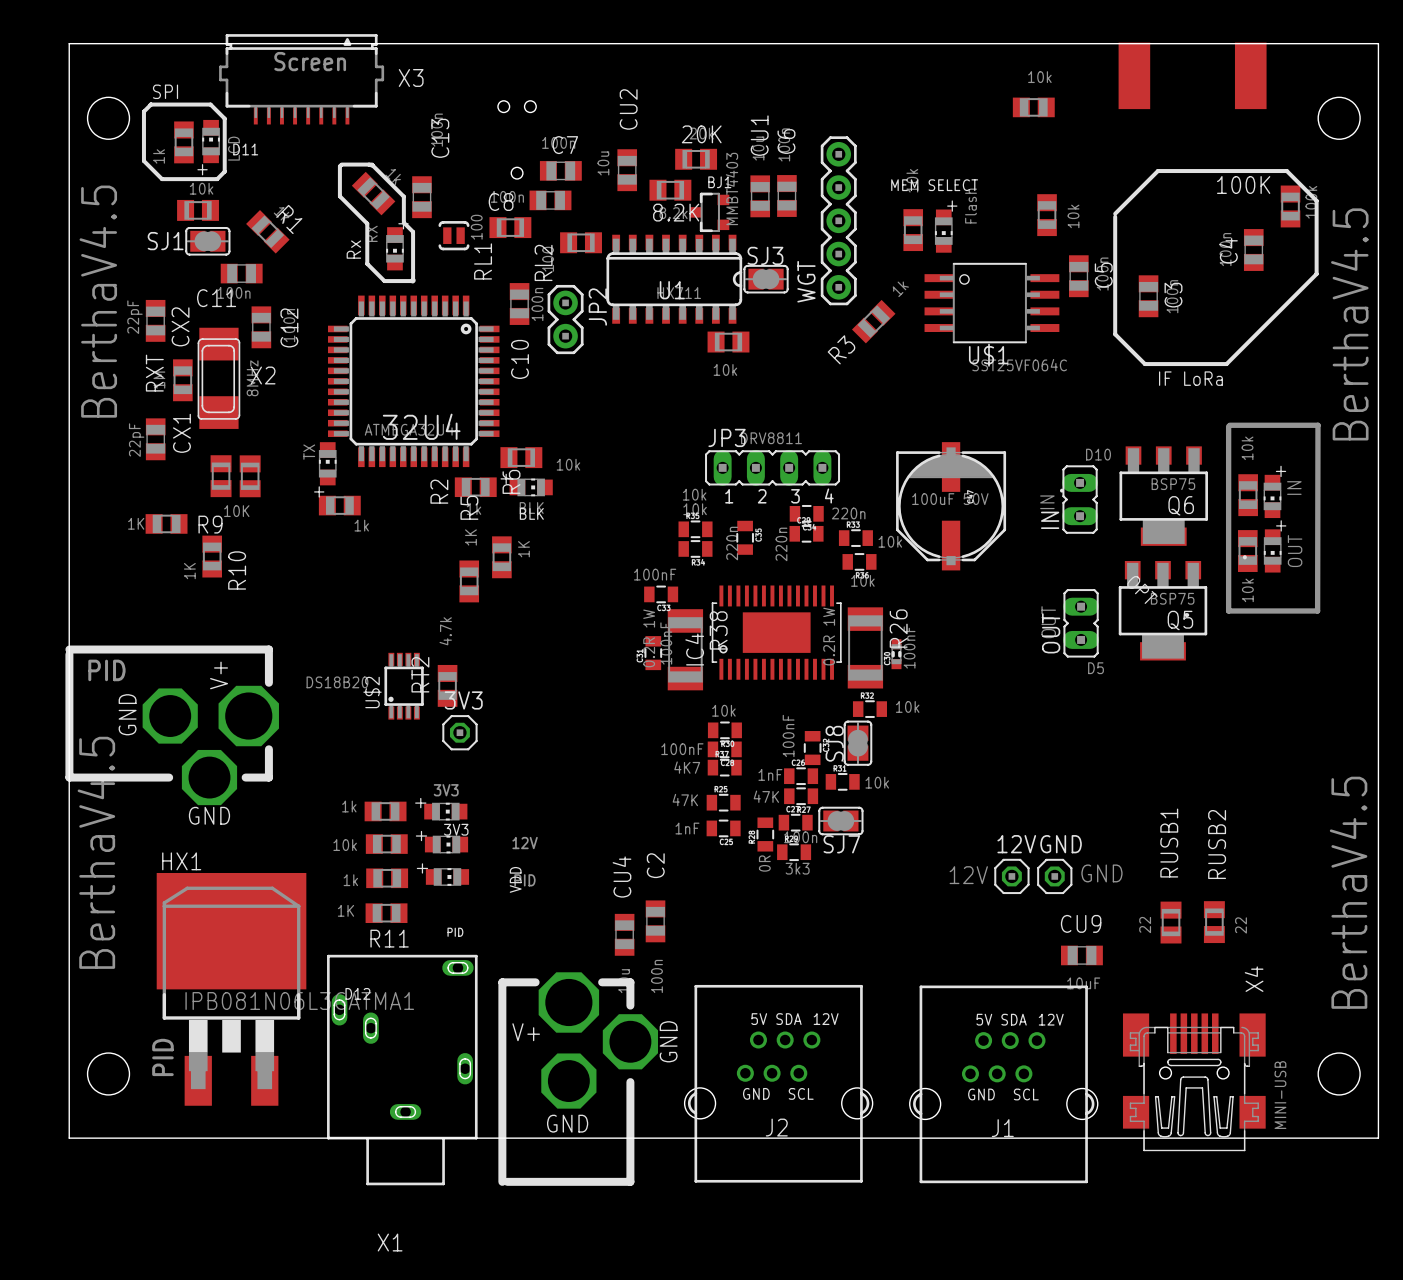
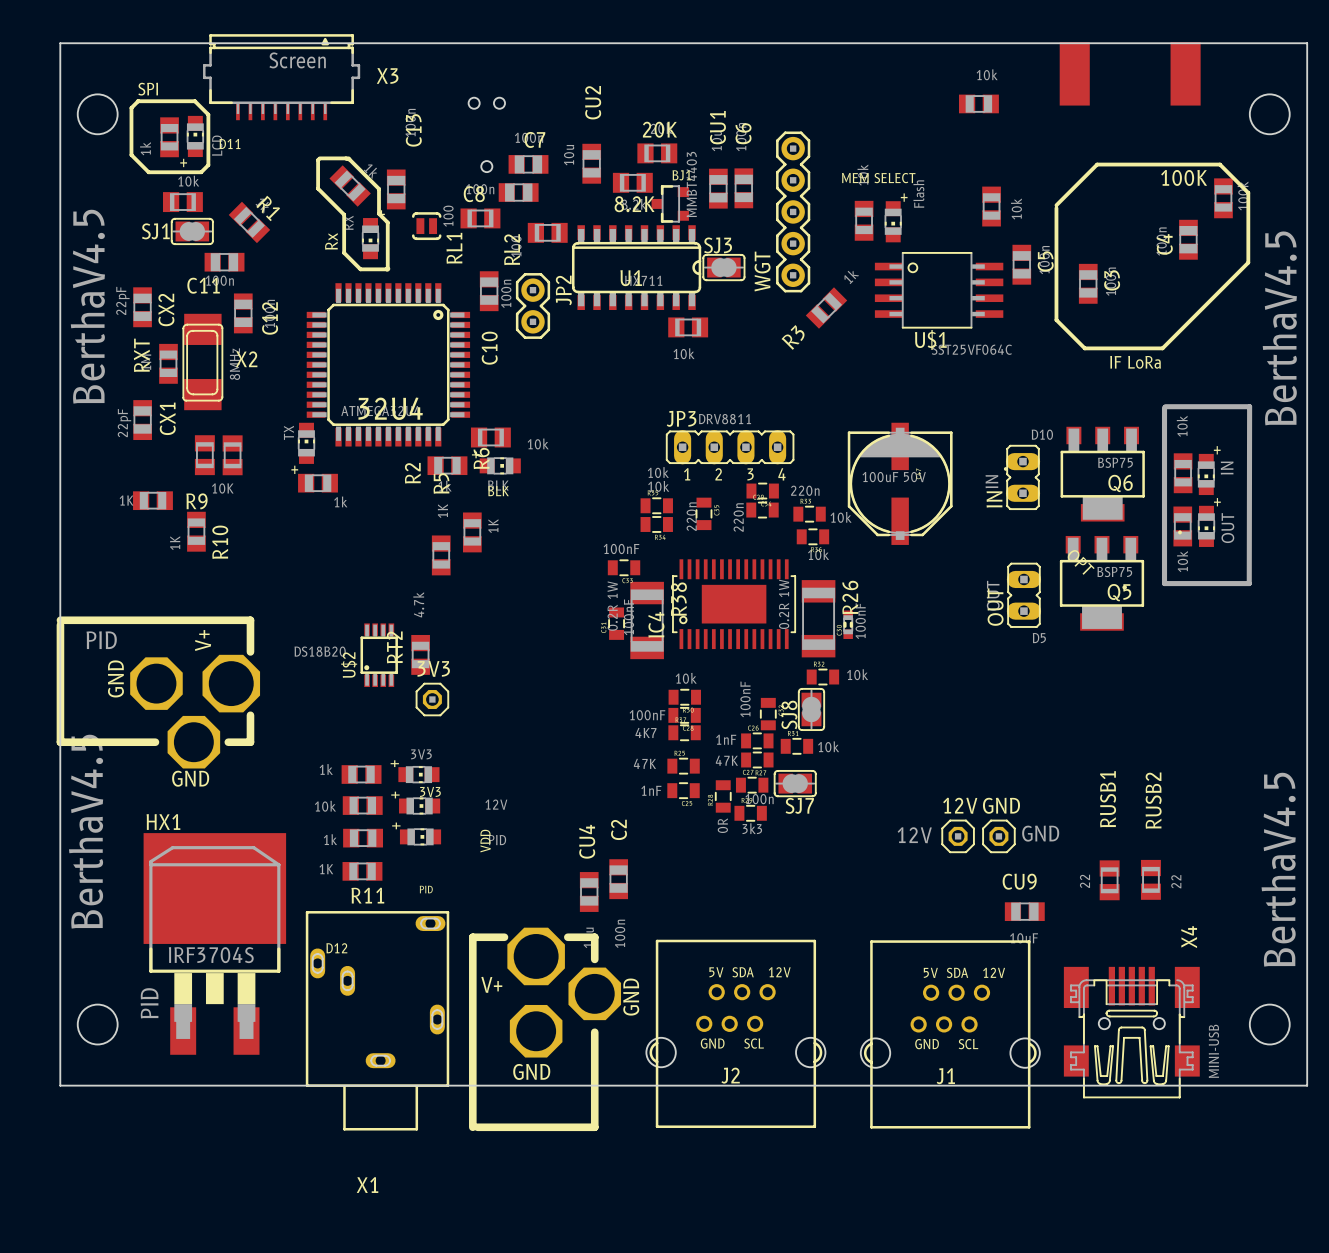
HX1 value: IPB081N06L3GATMA1 (299, 1001) -> IRF3704S (211, 955)

